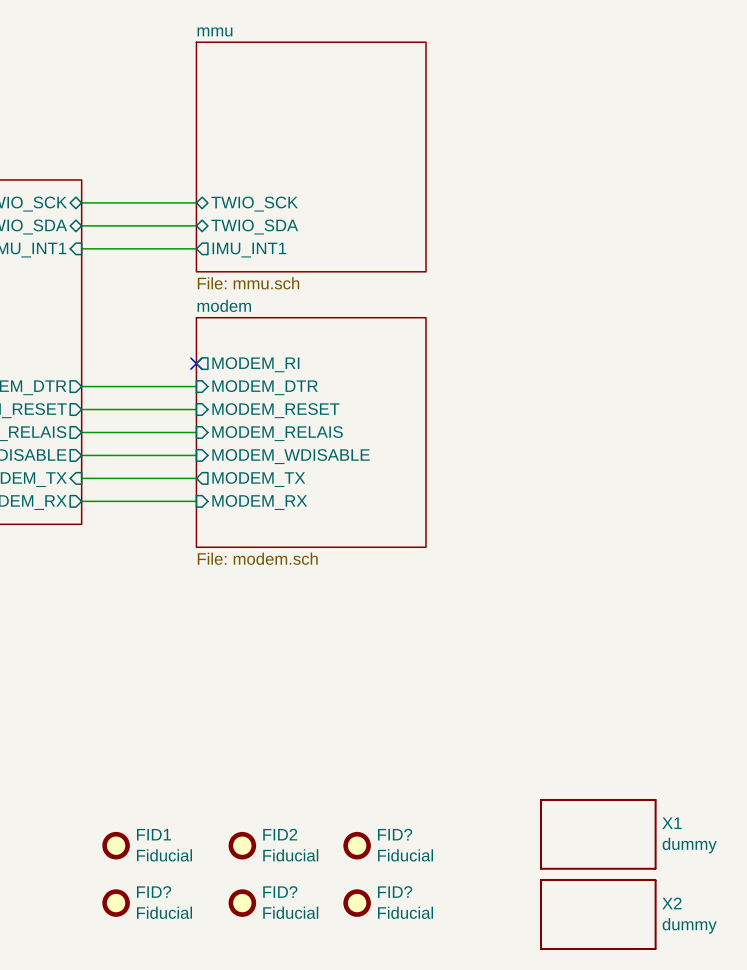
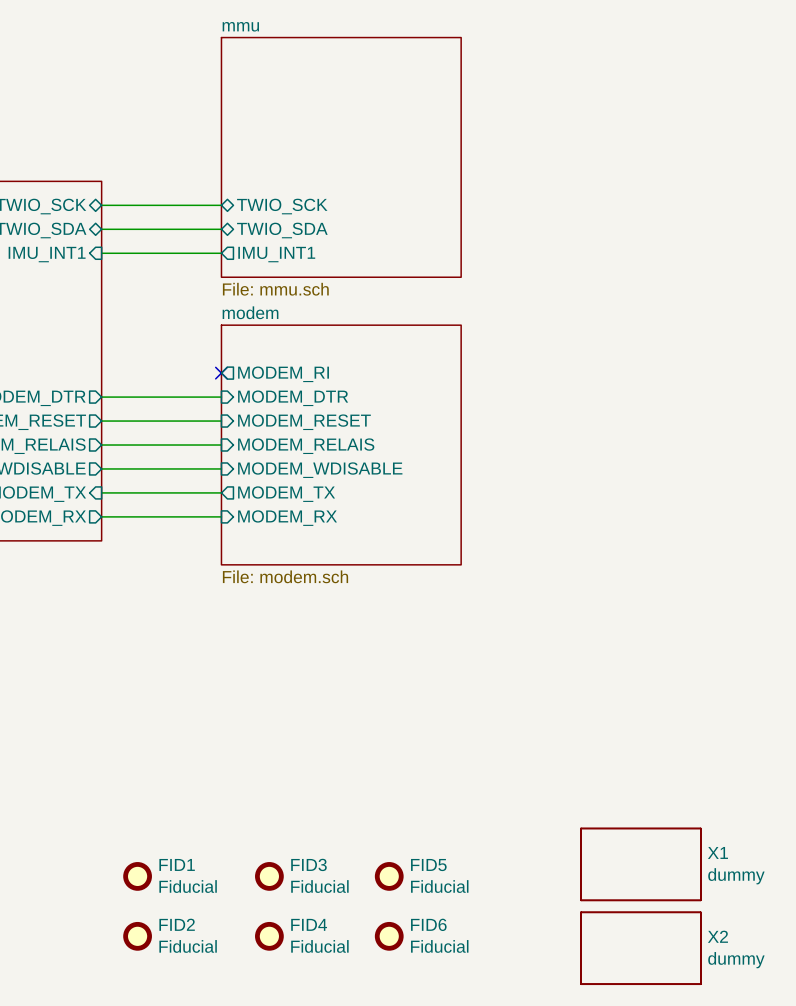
FID2 name: FID2 (280, 834) -> FID3 (308, 864)
FID? name: FID? (395, 834) -> FID5 (428, 865)
FID? name: FID? (154, 892) -> FID2 (177, 924)
FID? name: FID? (280, 892) -> FID4 (309, 924)
FID? name: FID? (395, 892) -> FID6 (428, 924)

